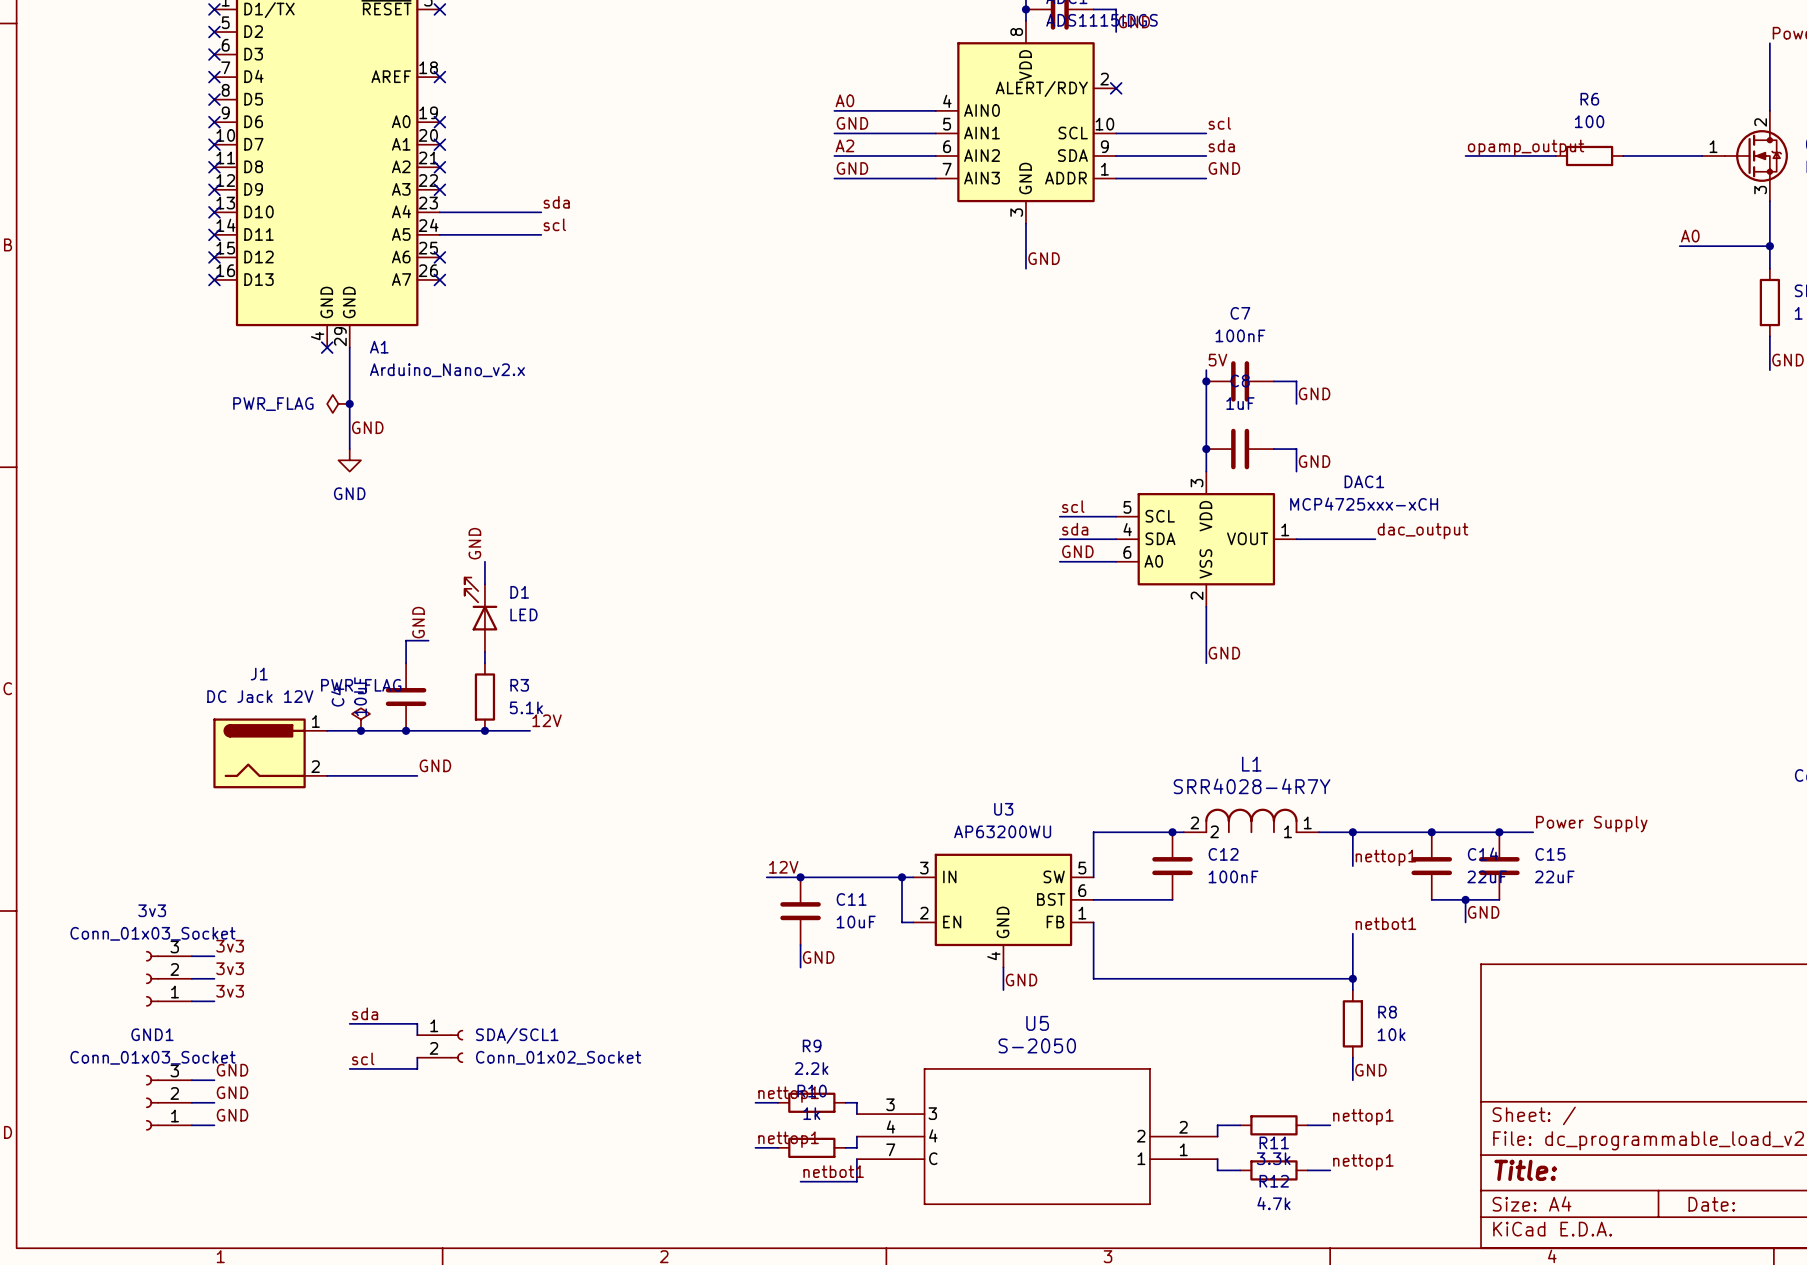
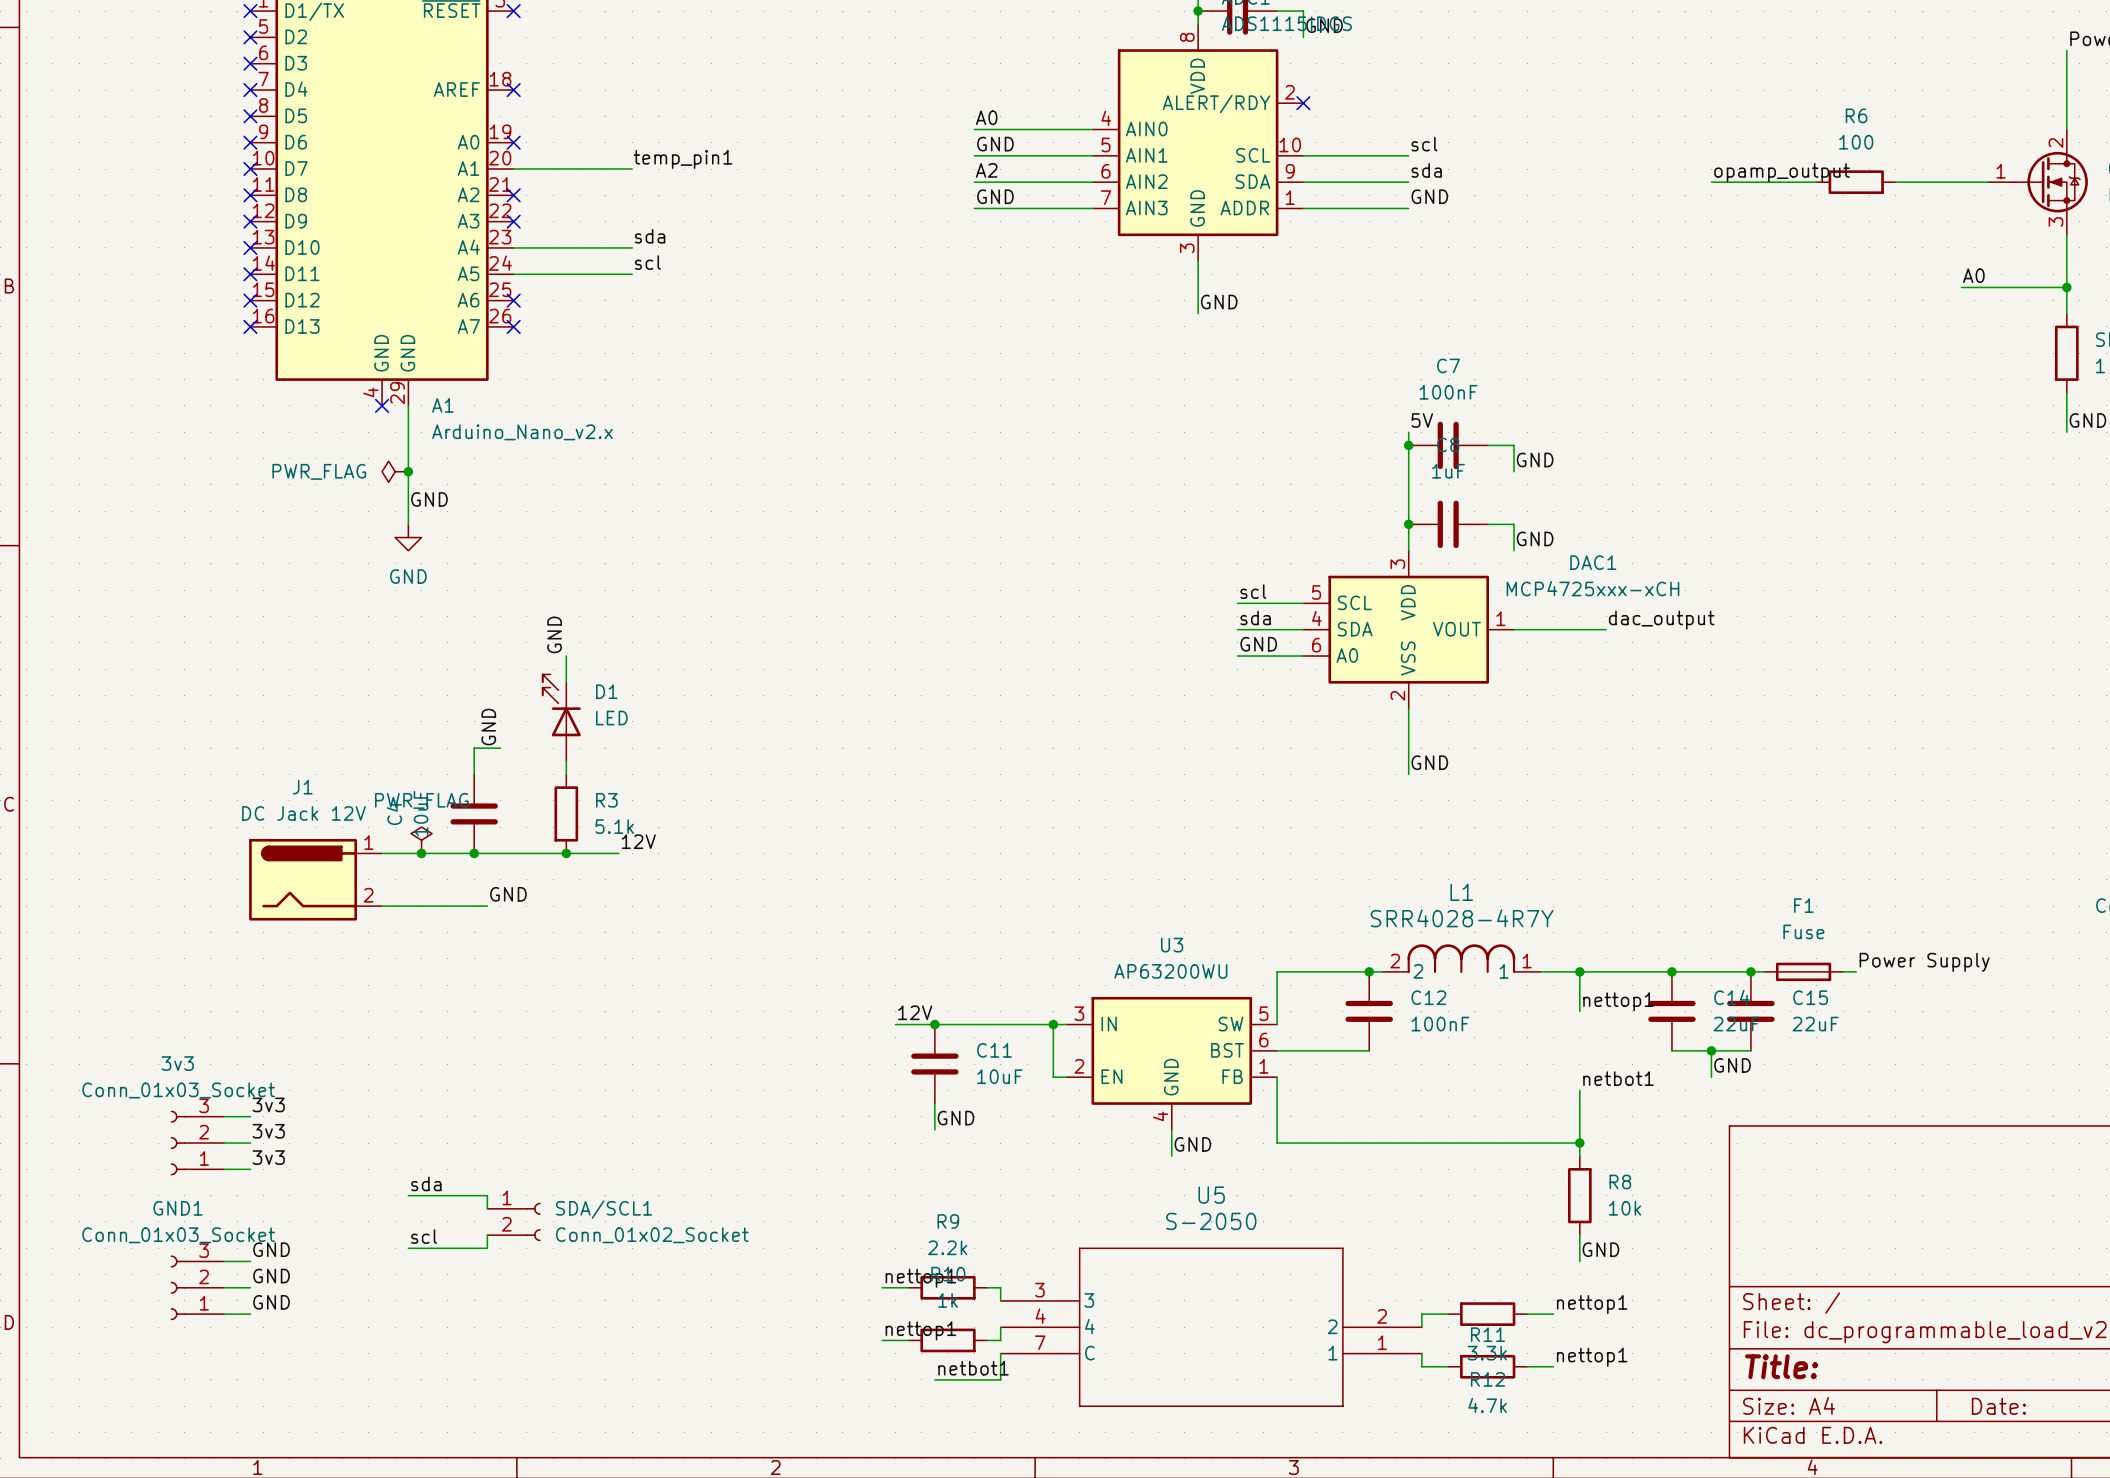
label: none -> temp_pin1 (683, 159)
wire: none -> (513, 169) (632, 169)
no-connect mark: (439, 144) -> none
label position: Power Supply (1591, 824) -> Power Supply (1924, 962)
F1: none -> Fuse (1803, 971)
wire: none -> (1843, 971) (1856, 971)

